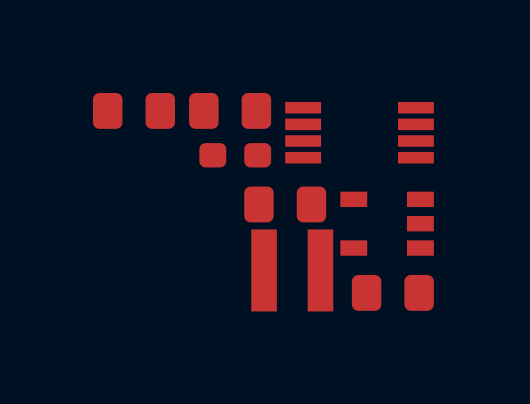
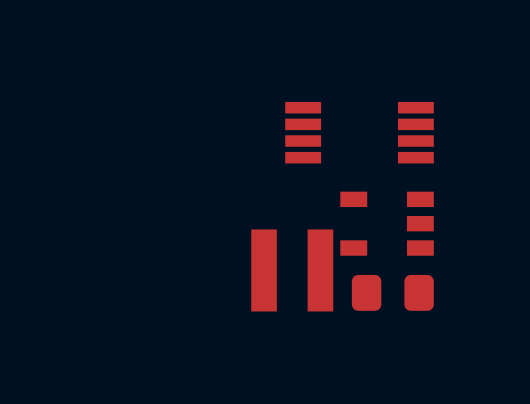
part: (133, 110) -> none
part: (230, 110) -> none
part: (235, 155) -> none
part: (285, 204) -> none

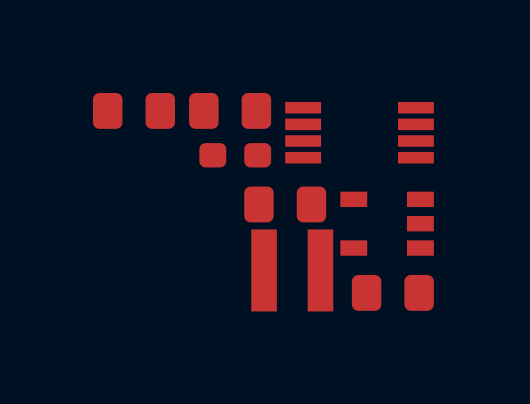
part: none -> (133, 110)
part: none -> (230, 110)
part: none -> (235, 155)
part: none -> (285, 204)

